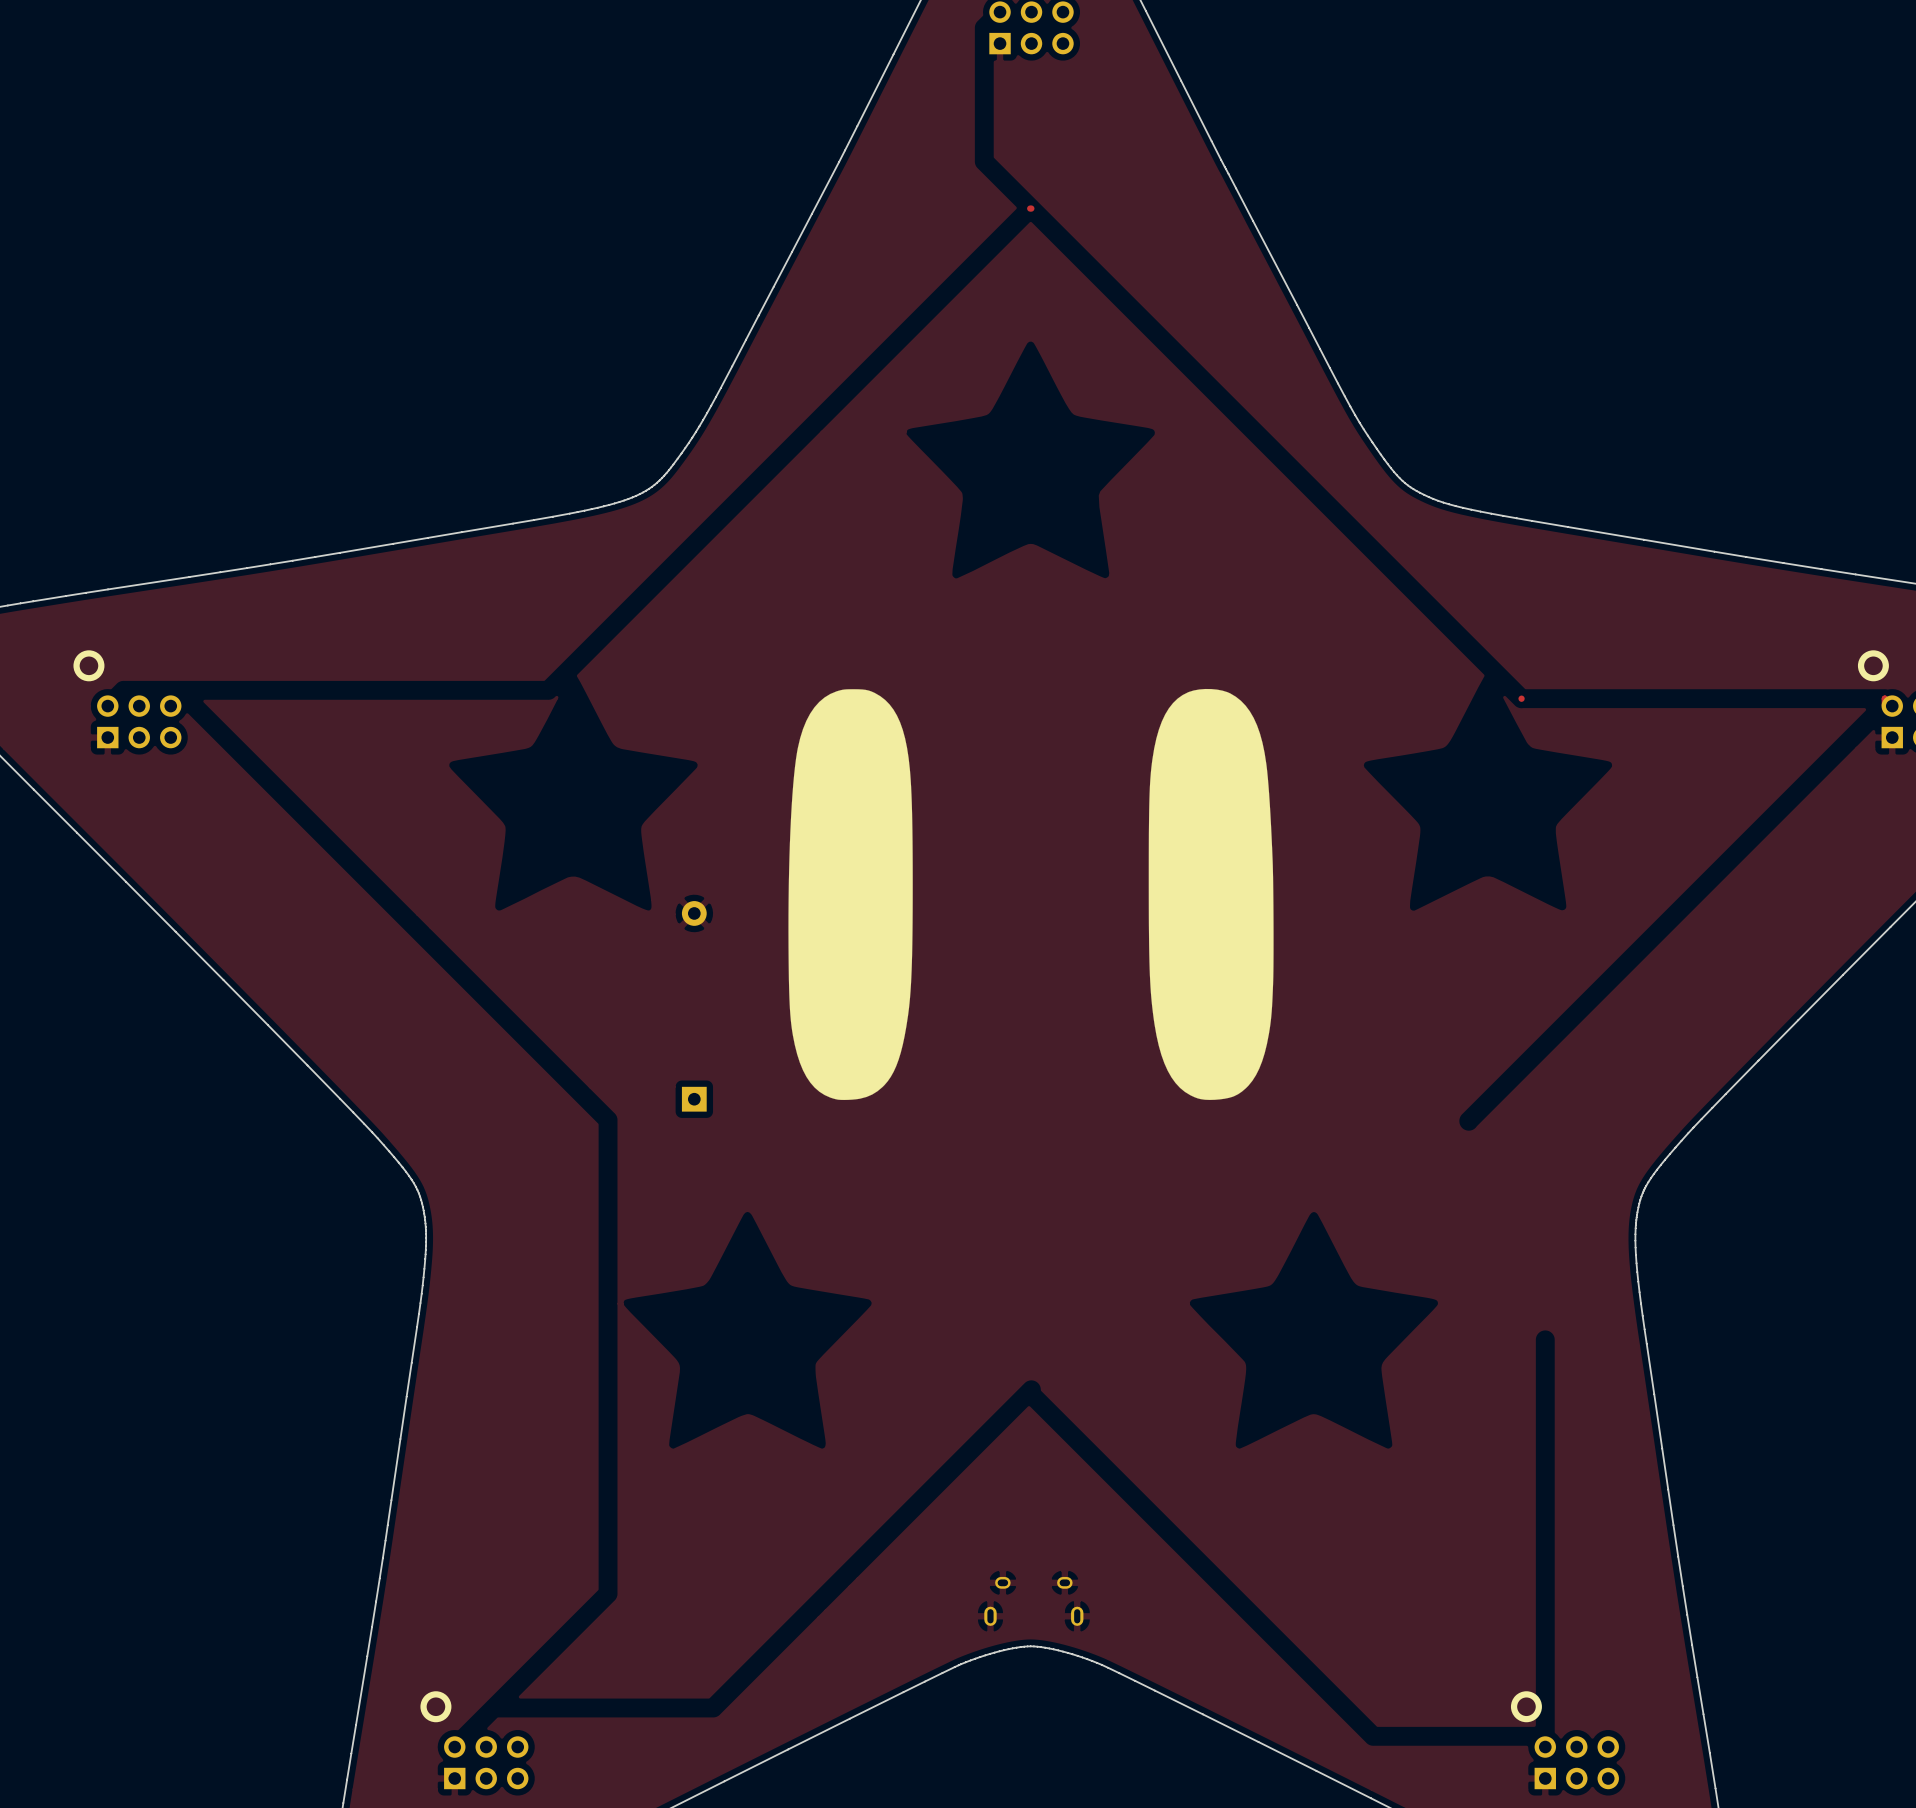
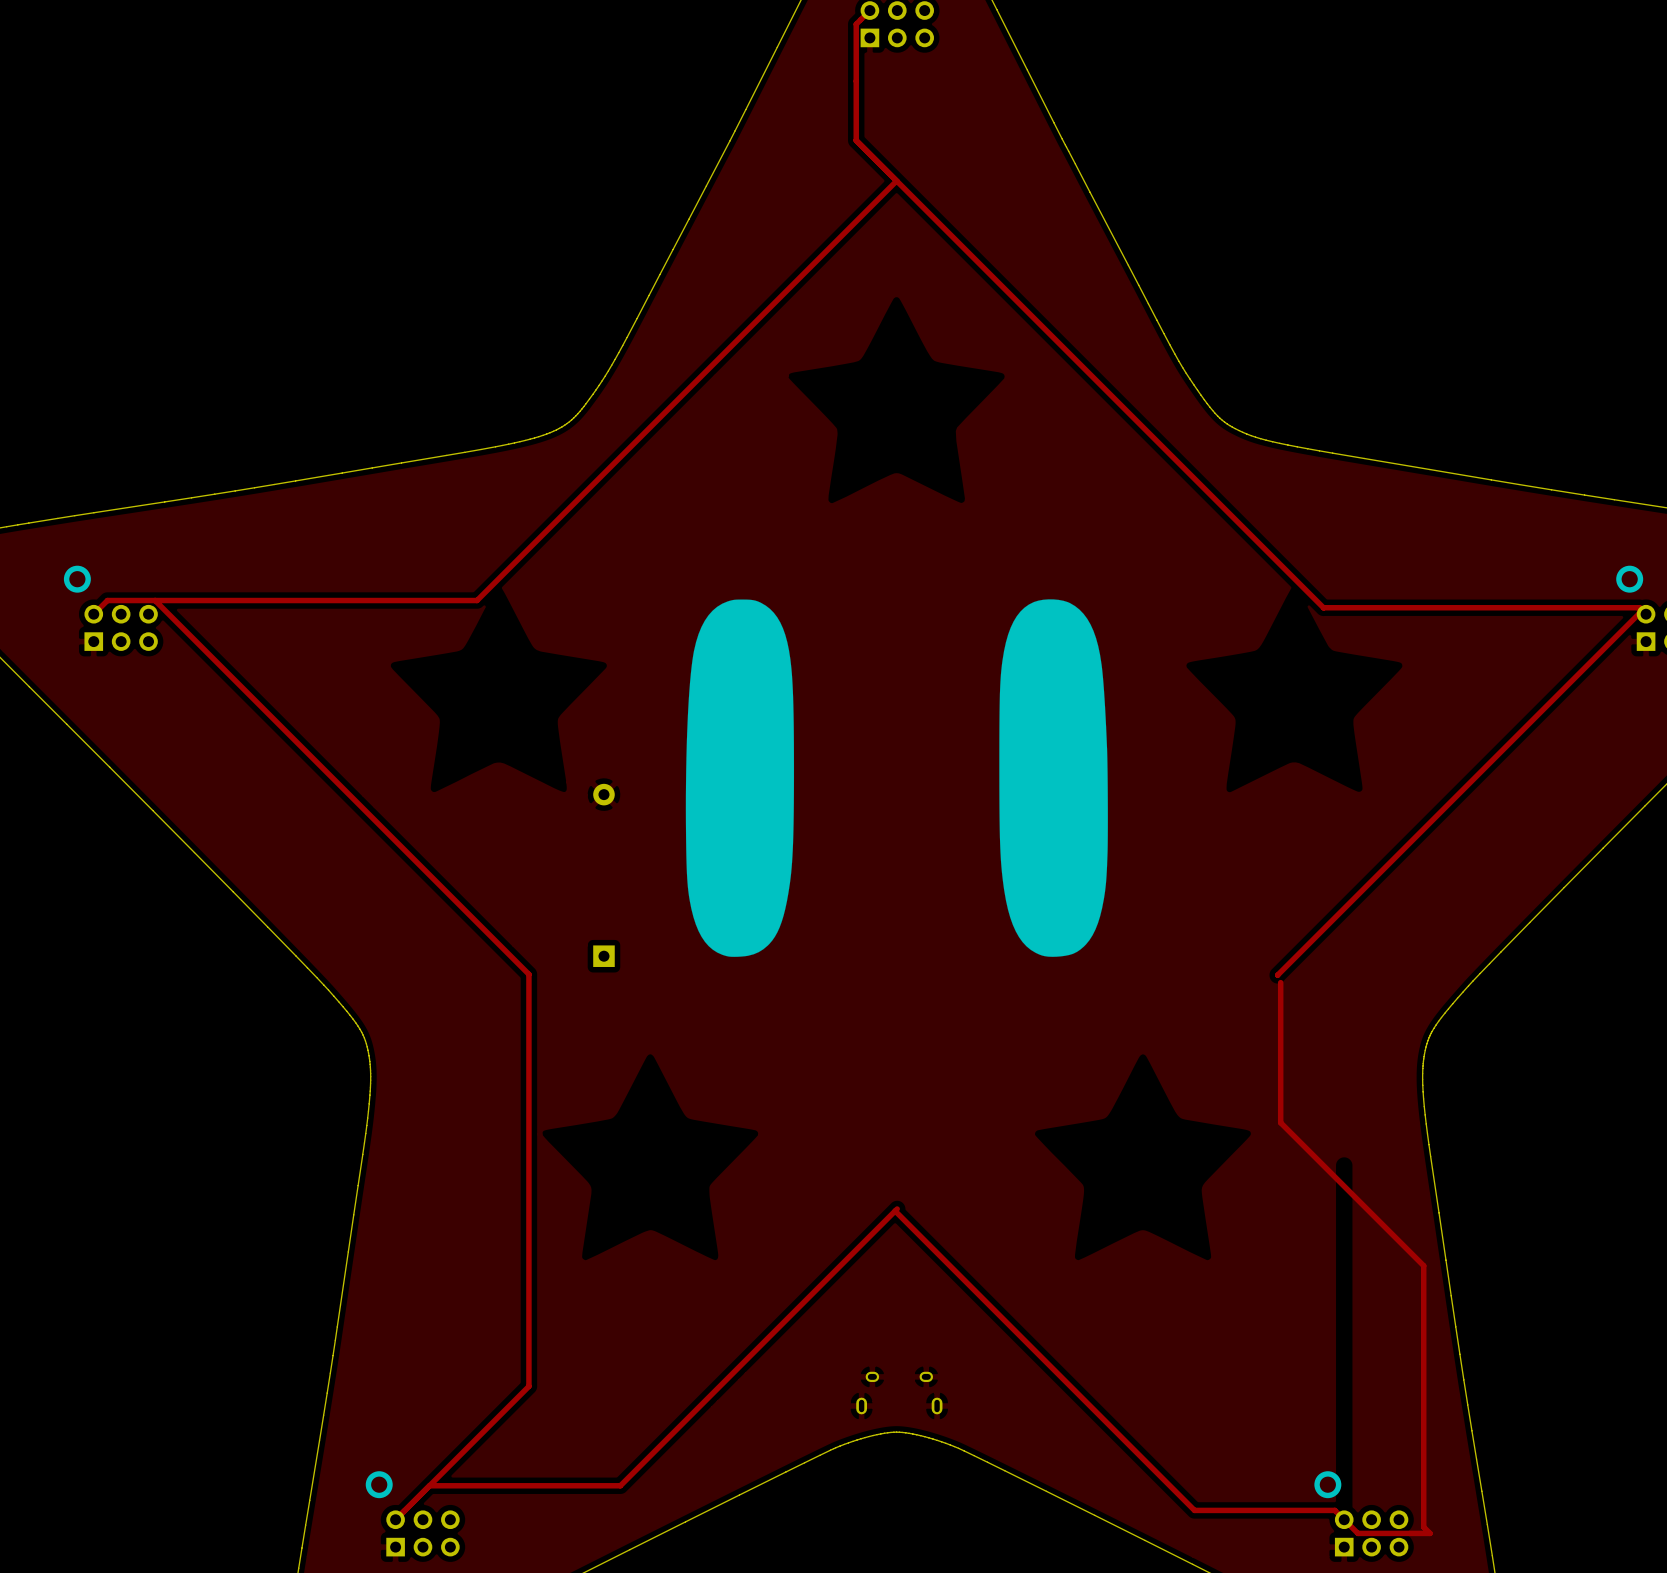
track: none -> (869, 10) (856, 24) (856, 140) (1323, 607)
track: none -> (896, 181) (477, 600) (107, 600) (93, 614)
track: none -> (155, 600) (528, 974) (528, 1386) (395, 1519)
track: none -> (1323, 607) (1639, 607)
track: none -> (1639, 613) (1277, 975)
track: none -> (1280, 982) (1280, 1122) (1423, 1265) (1423, 1527) (1430, 1533) (1357, 1533) (1334, 1510) (1194, 1510) (895, 1211)
track: none -> (897, 1208) (620, 1485) (429, 1485)

